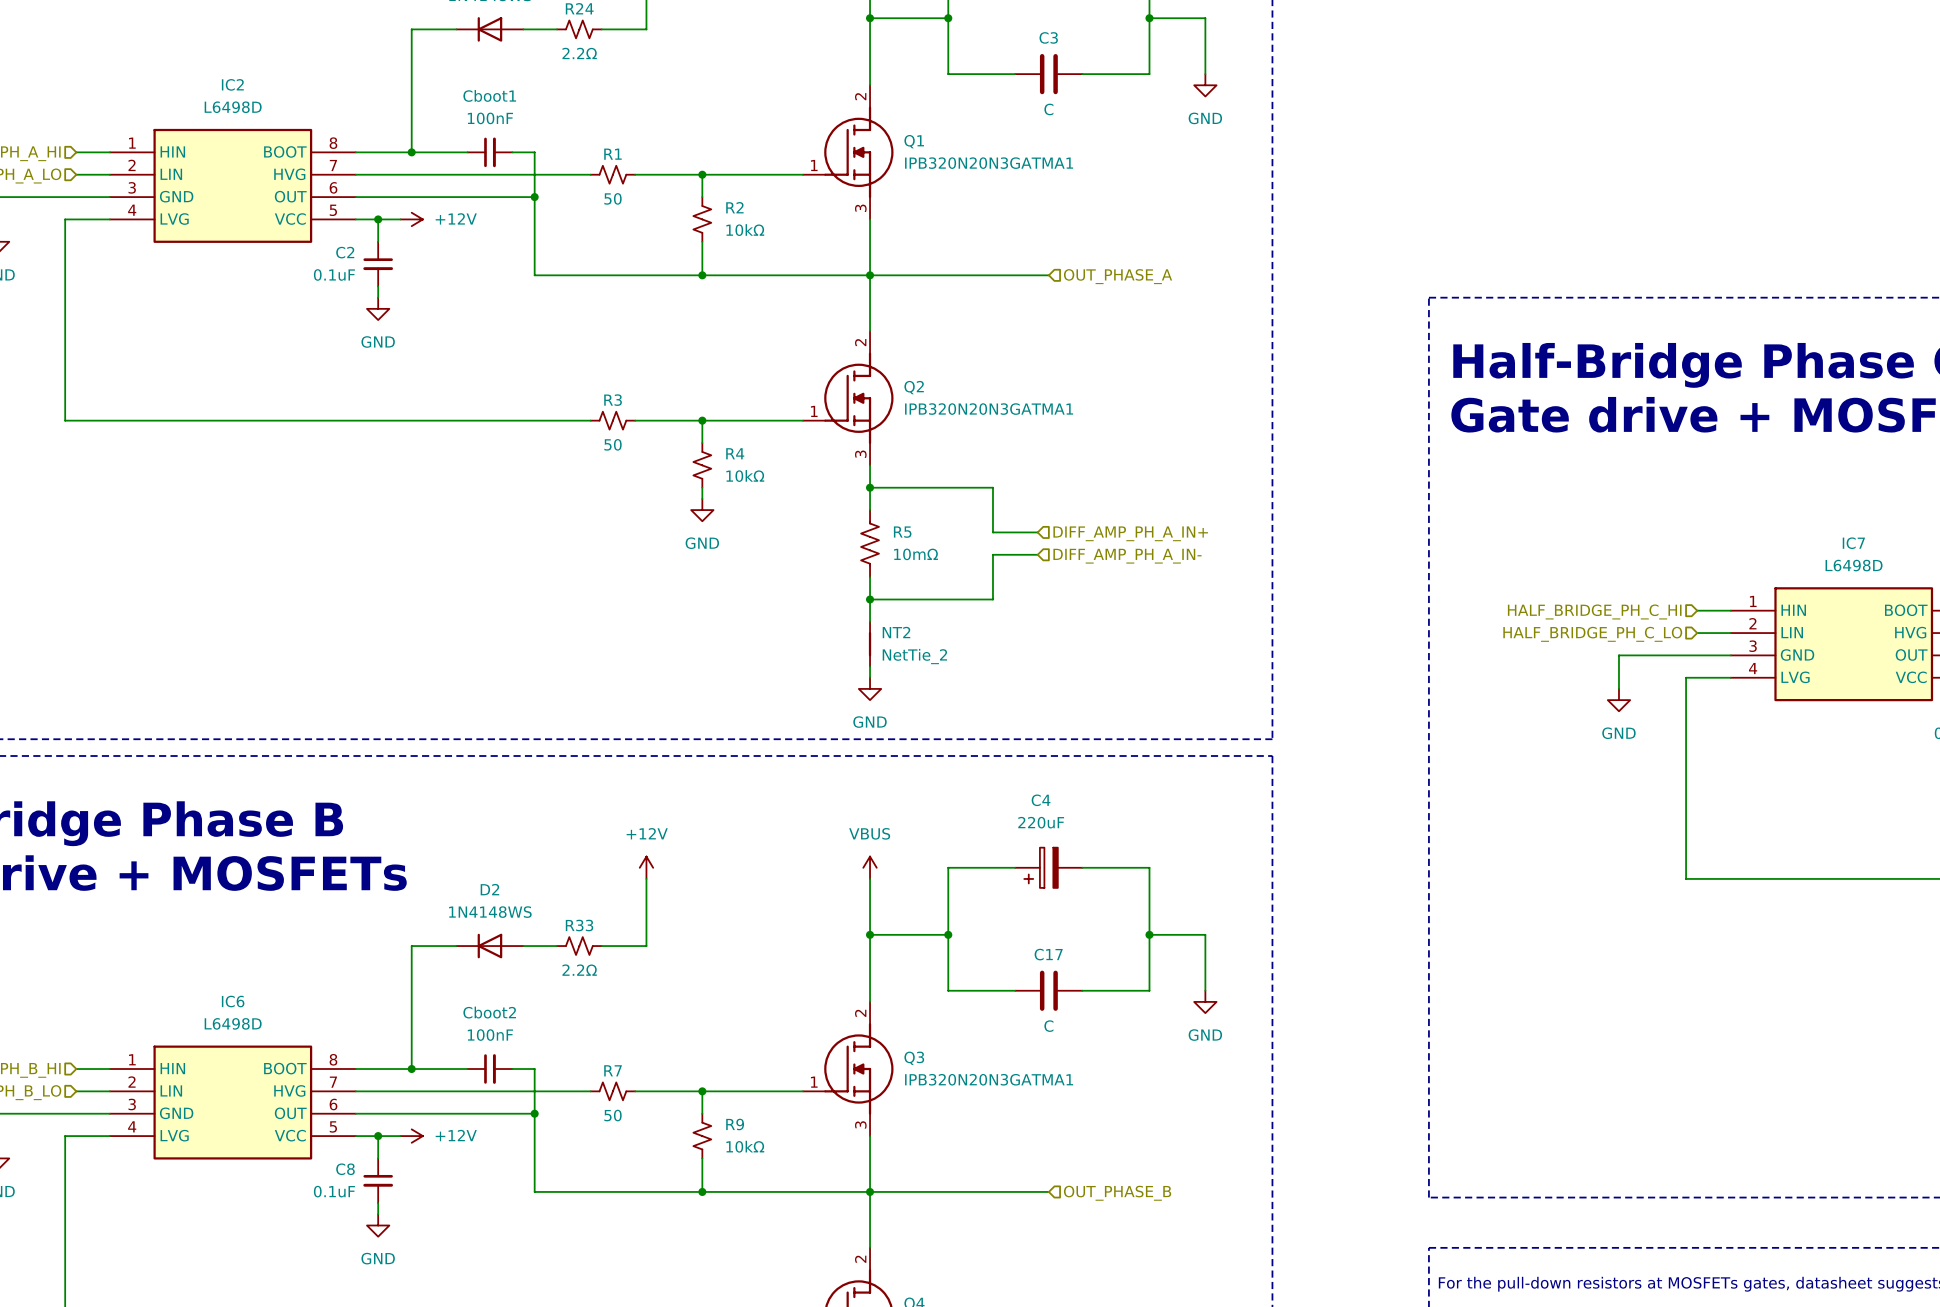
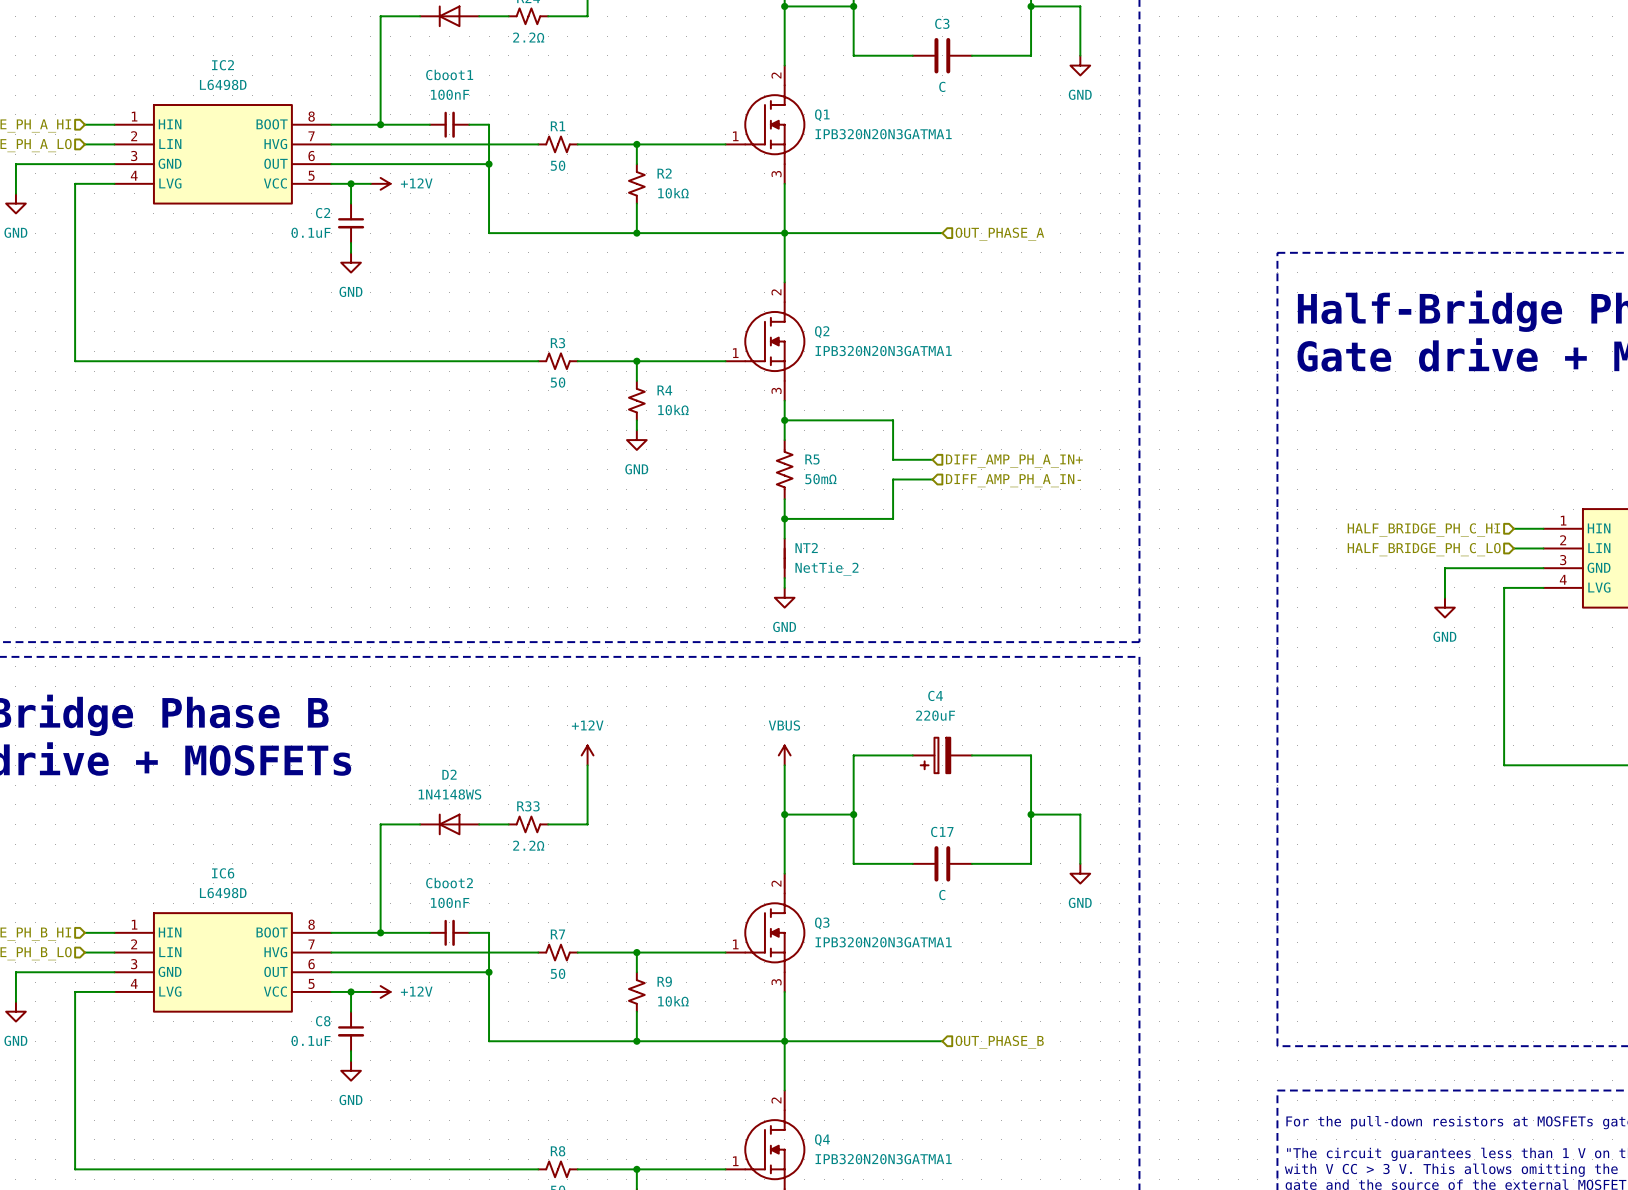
R5 value: 10mΩ (916, 554) -> 50mΩ (820, 479)

